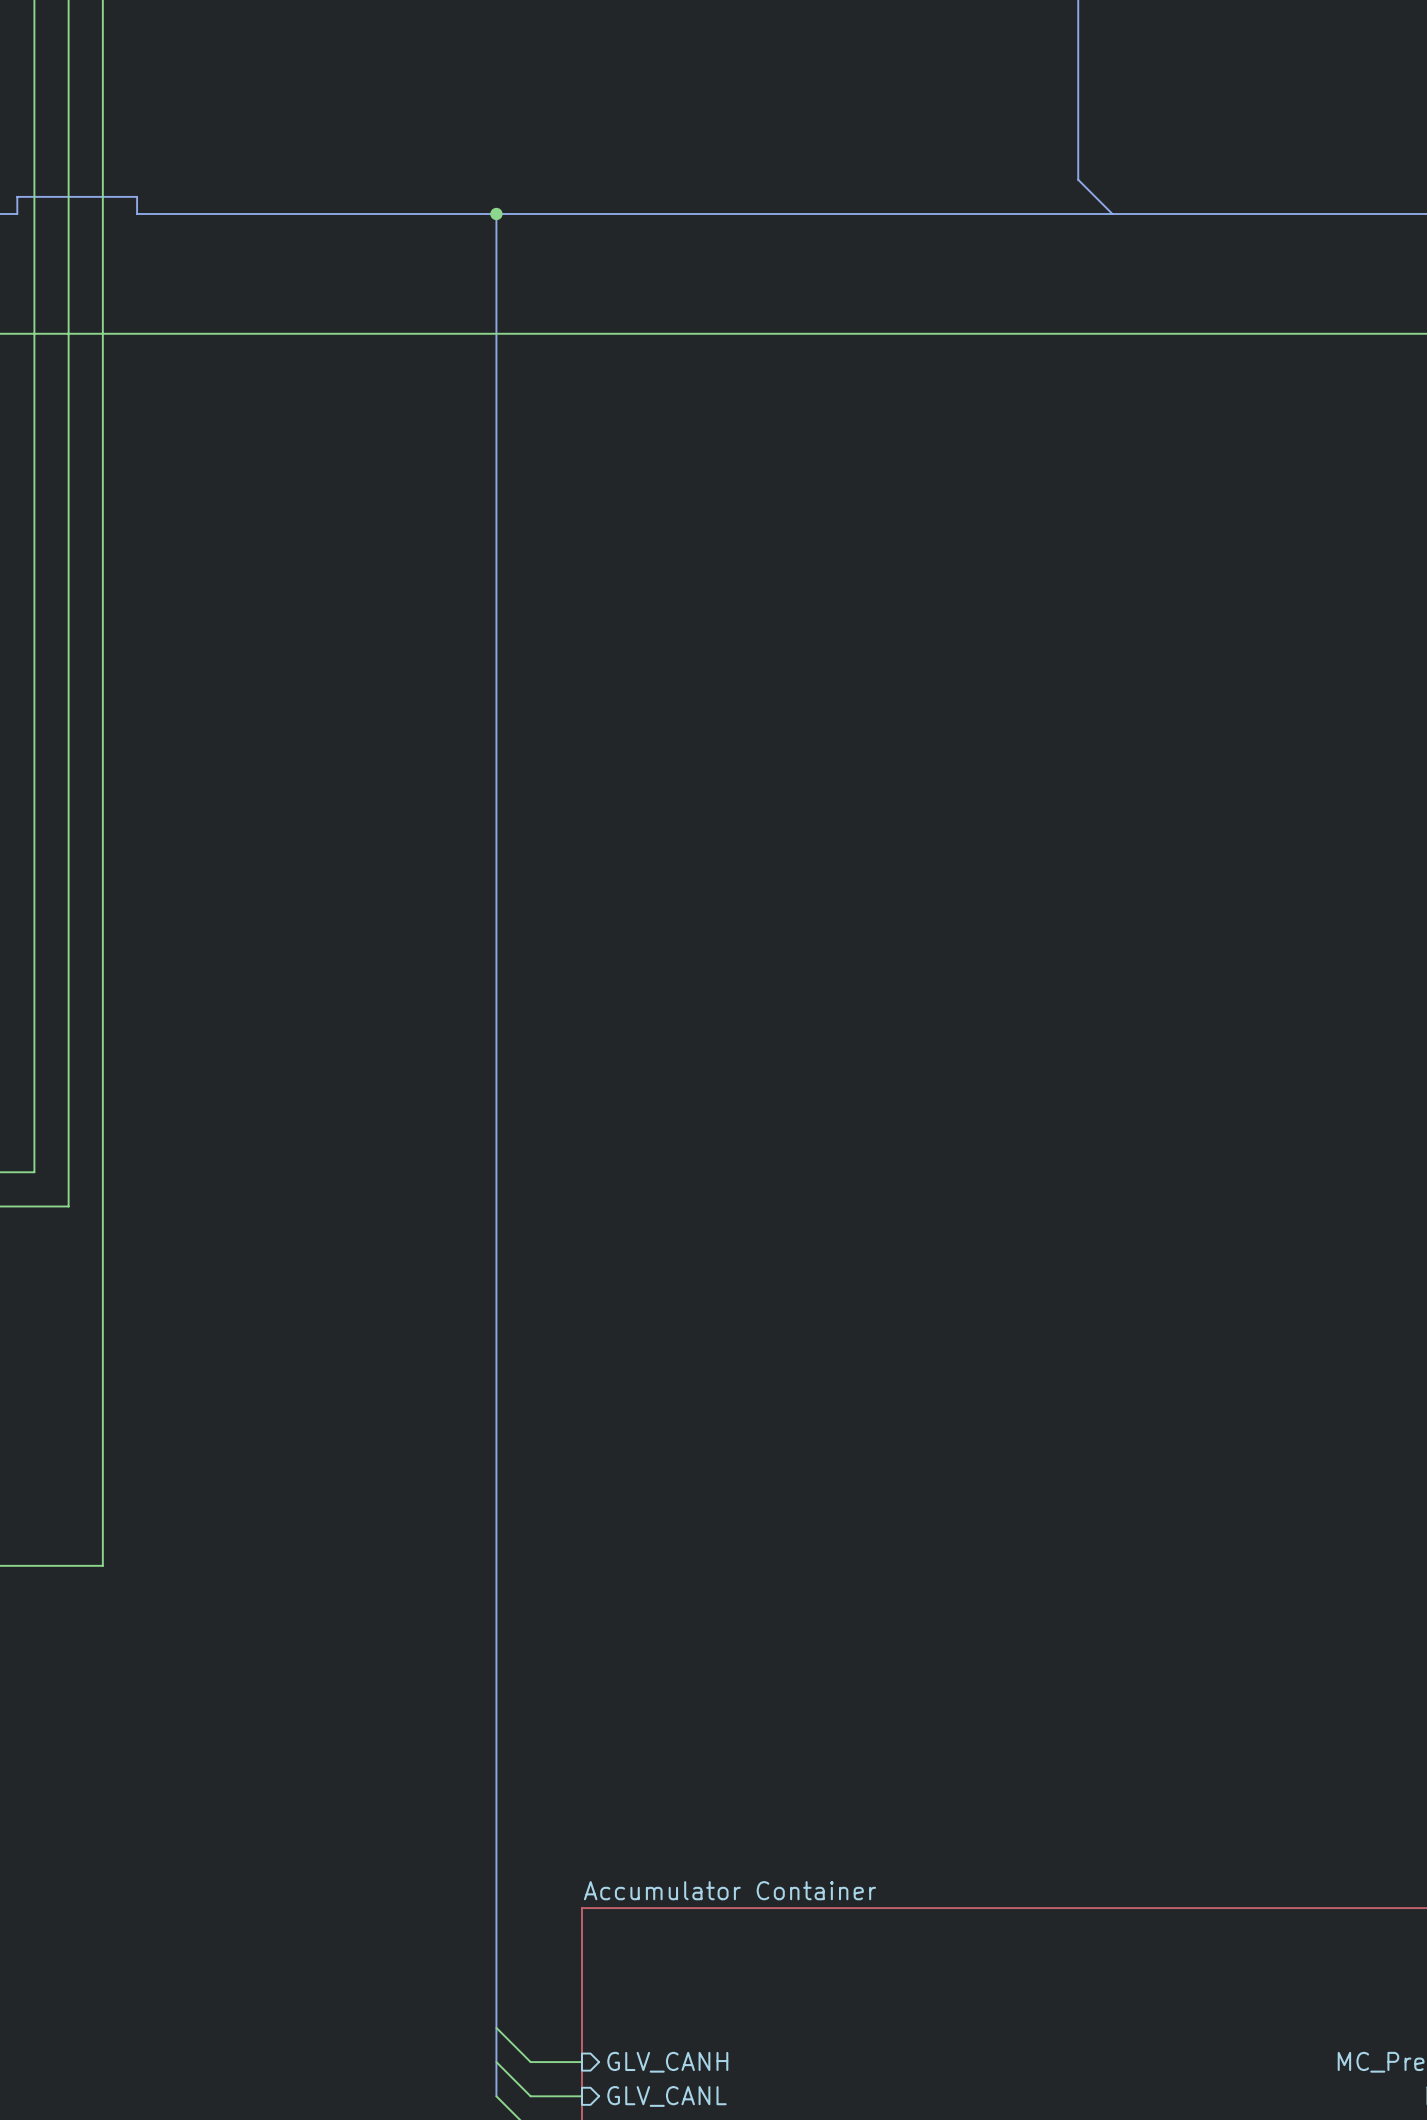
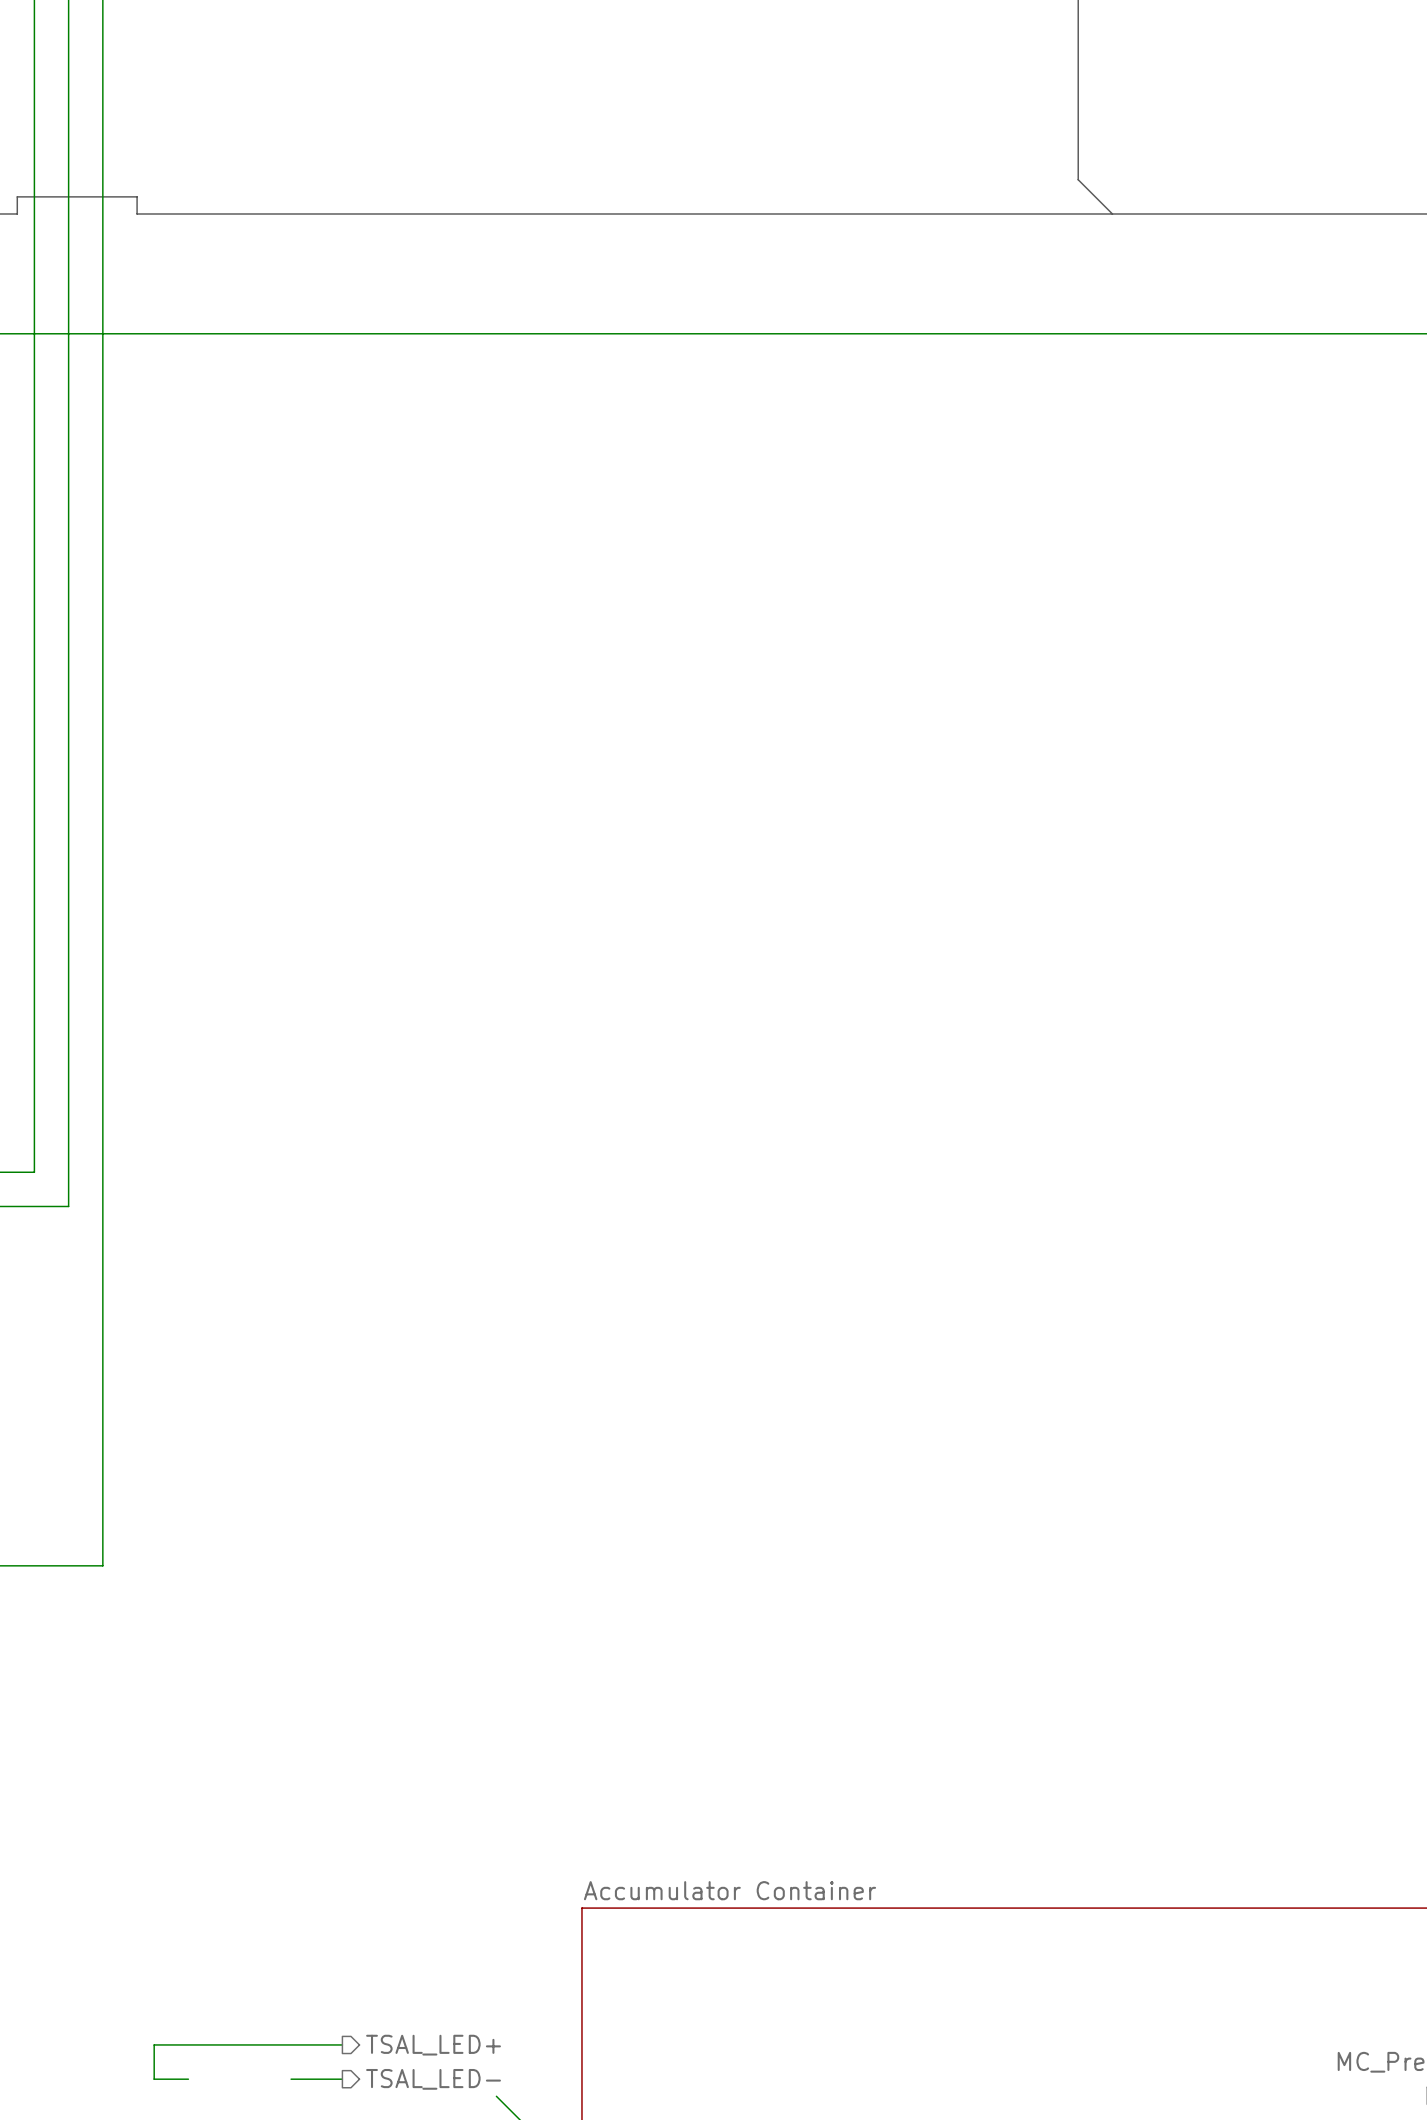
bus: (496, 213) (496, 2096) -> none
junction: (496, 213) -> none
wire: (496, 2027) (530, 2062) (581, 2062) -> none
wire: none -> (342, 2044) (154, 2044) (154, 2079) (188, 2079)
sheet pin: none -> TSAL_LED+ (433, 2045)
wire: (496, 2062) (530, 2096) (581, 2096) -> none
sheet pin: GLV_CANH (667, 2062) -> none
wire: none -> (291, 2079) (342, 2079)
sheet pin: none -> TSAL_LED- (433, 2079)
sheet pin: GLV_CANL (666, 2096) -> none

